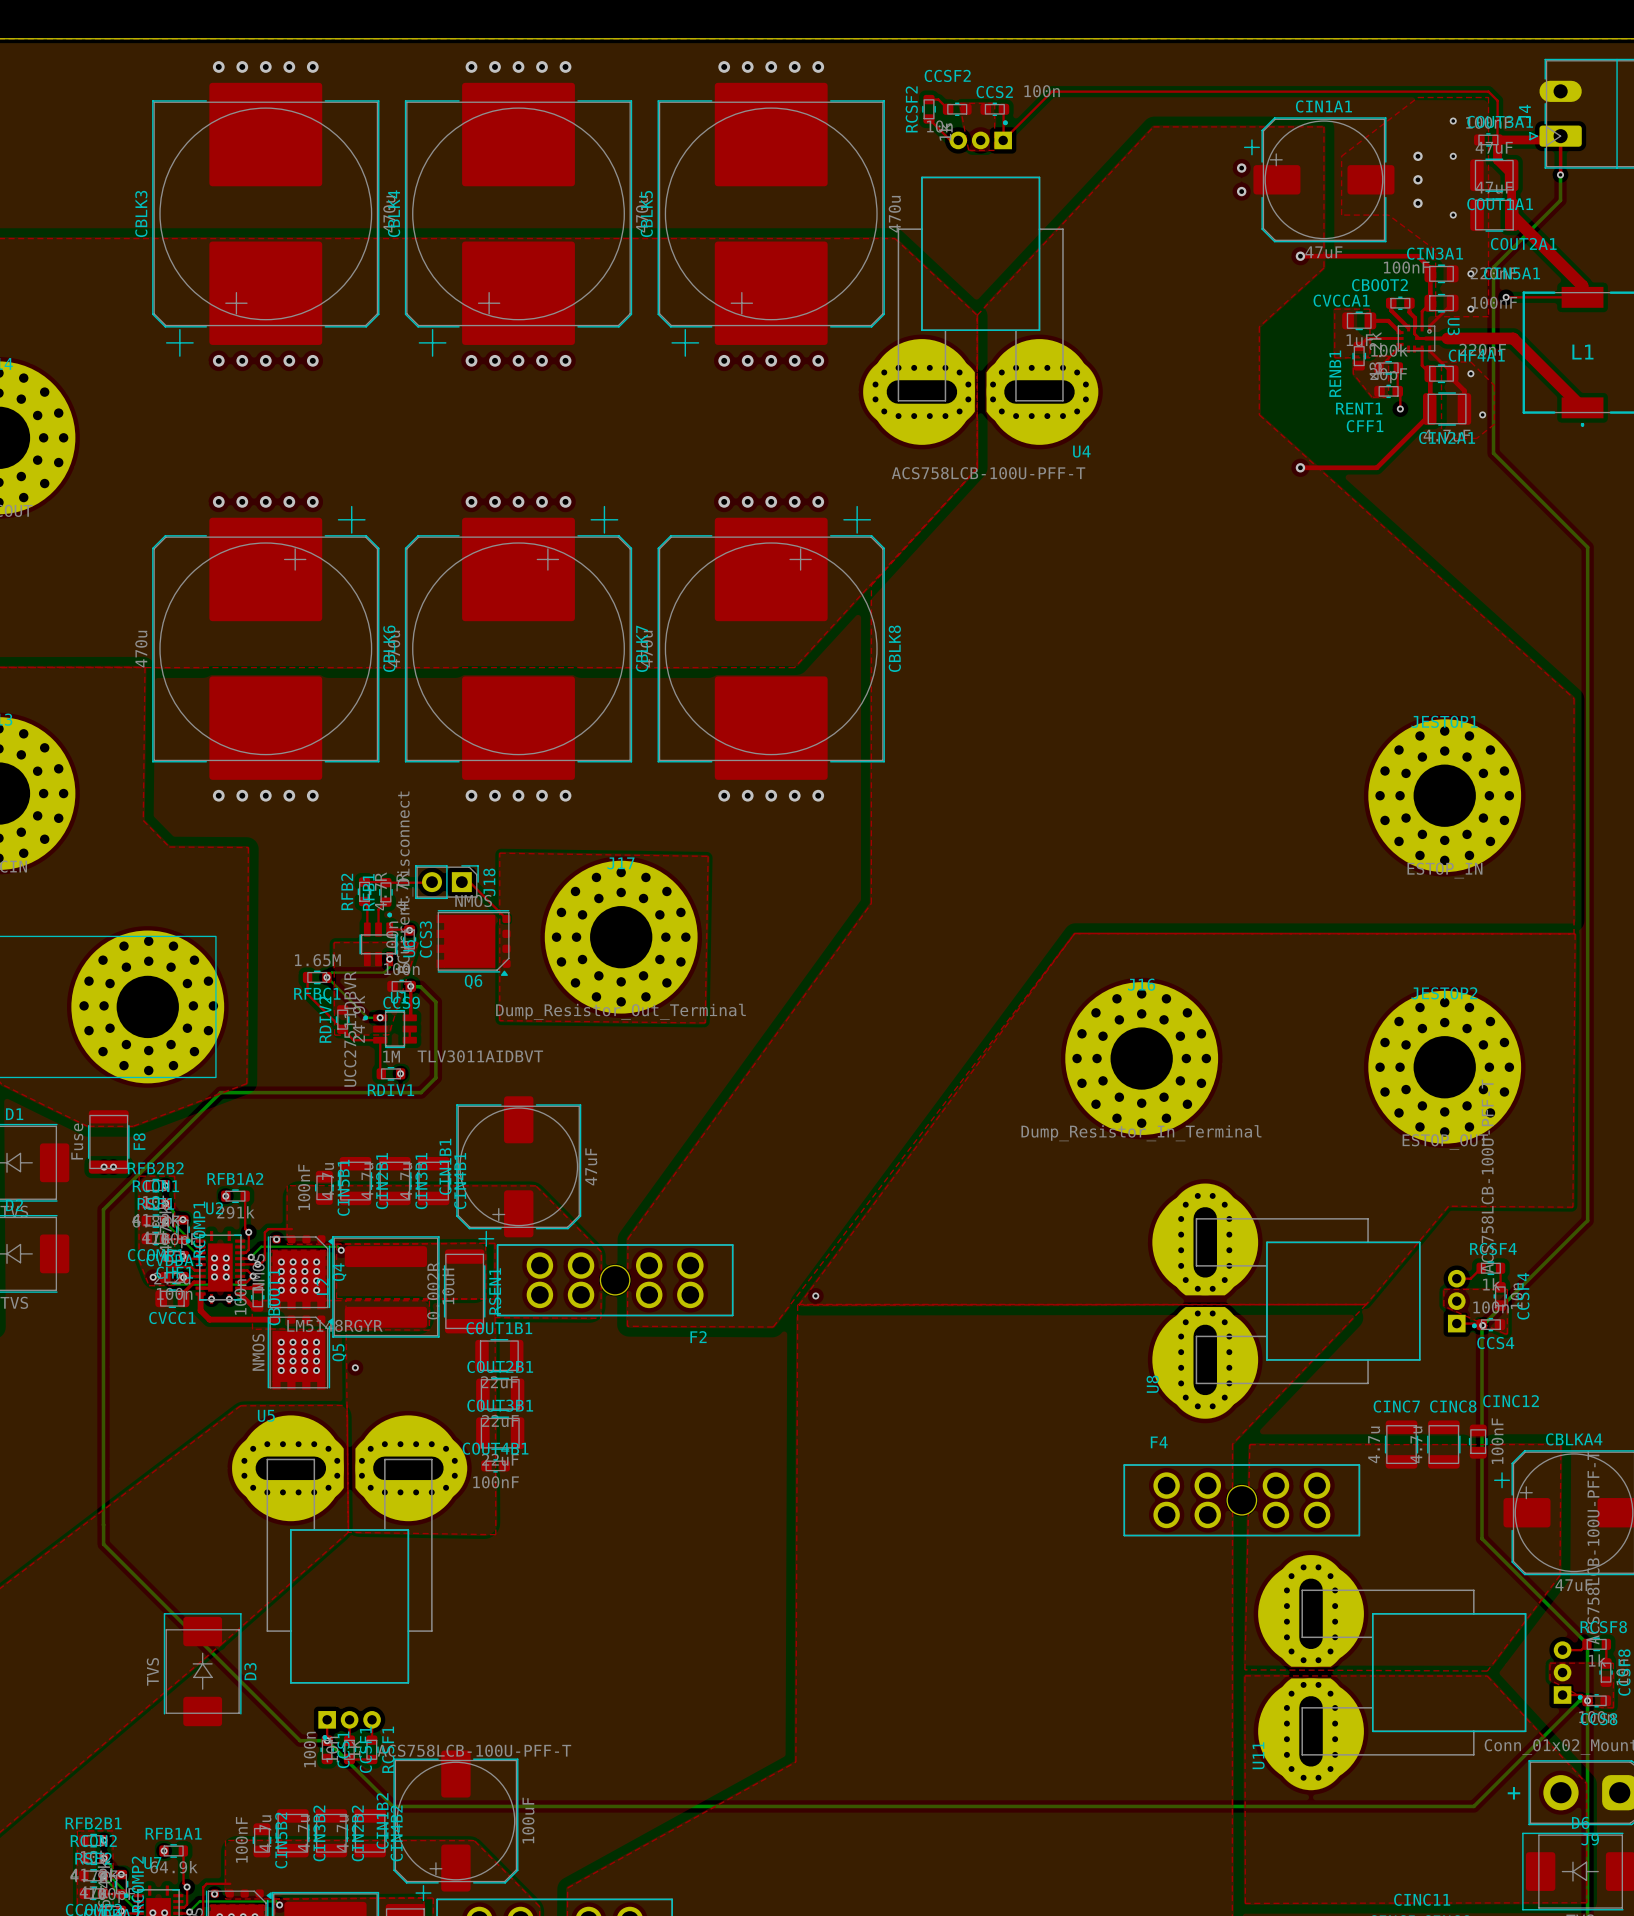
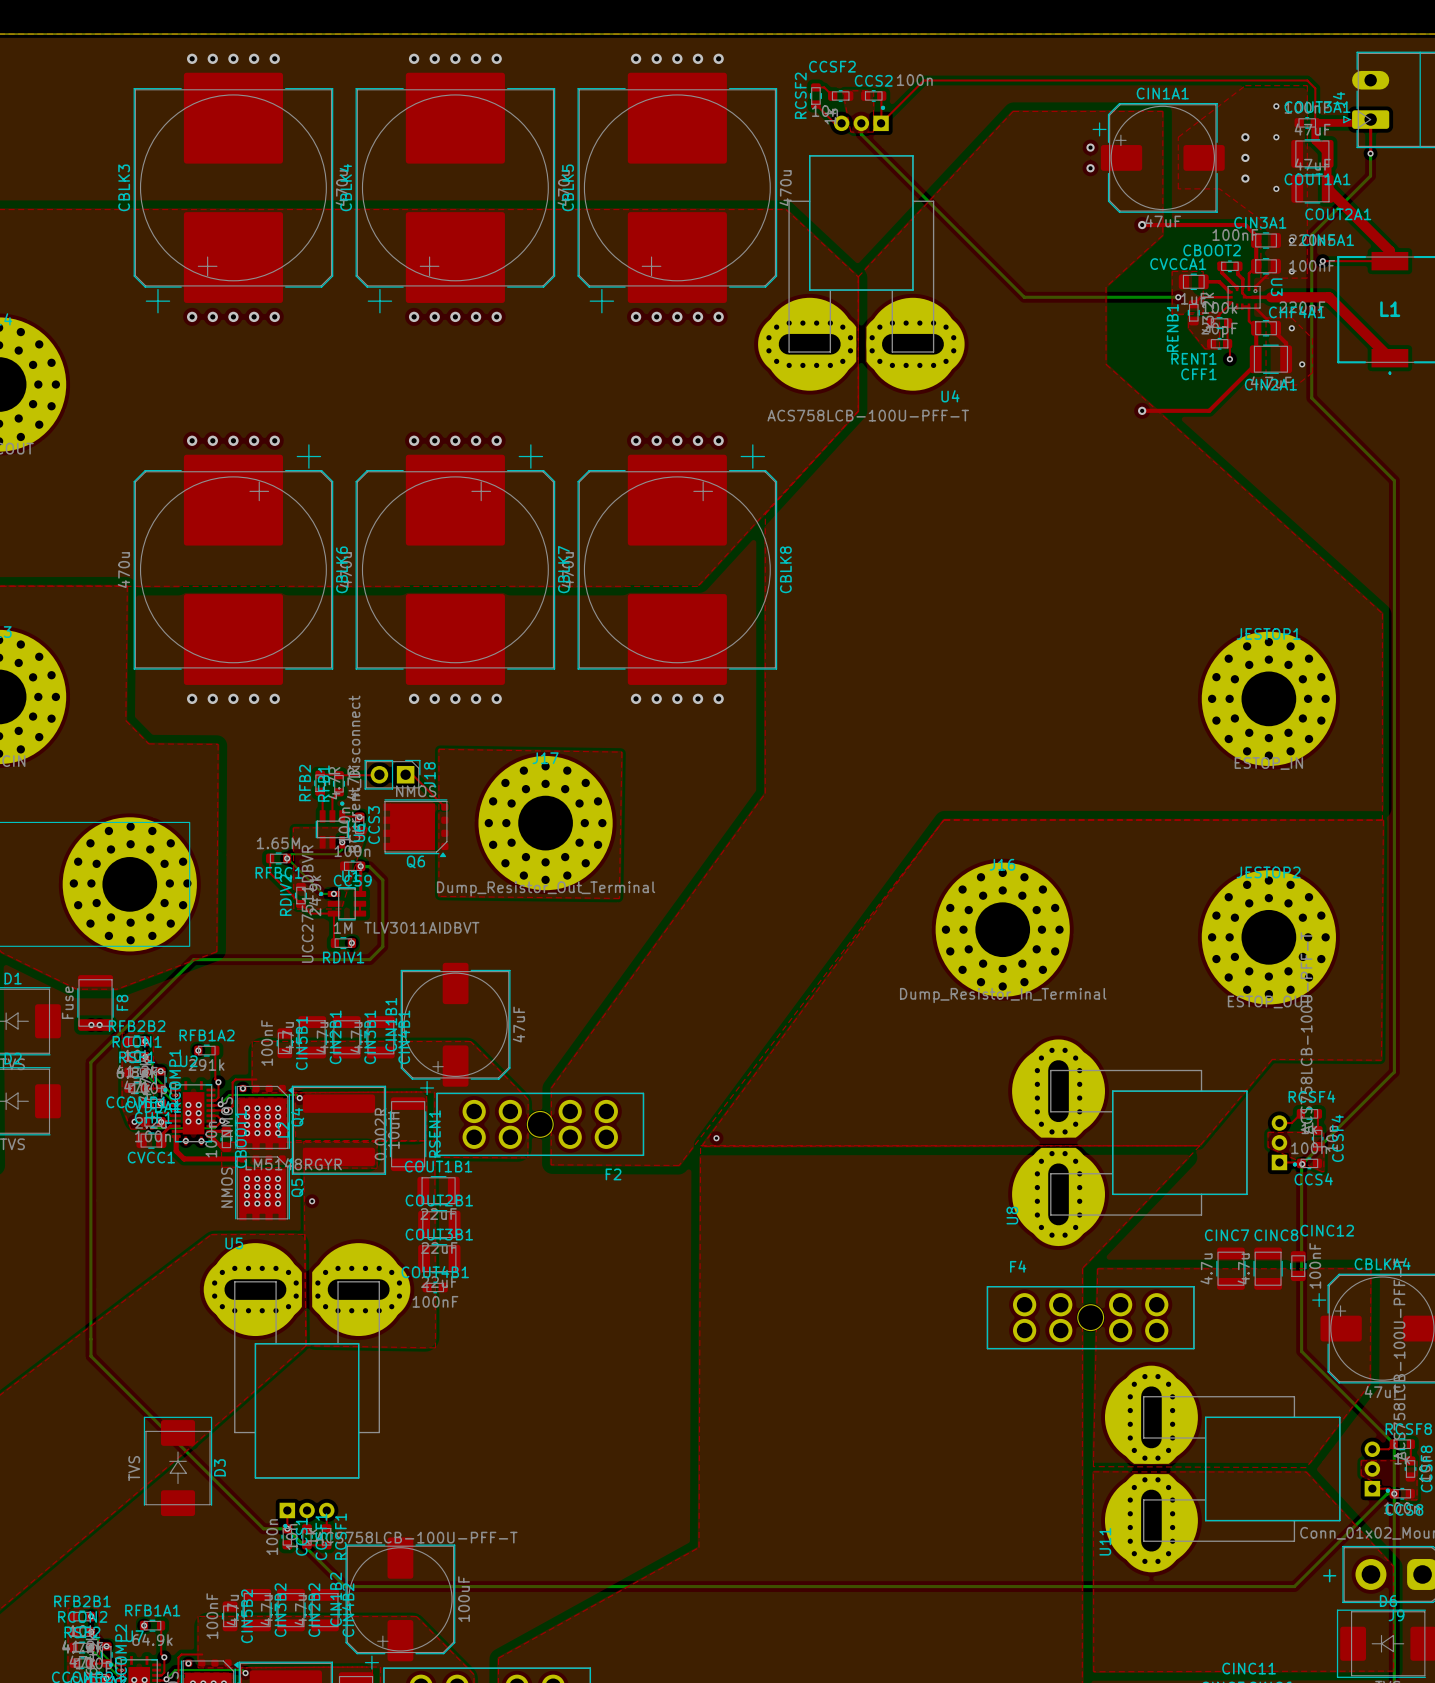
bottom track: none -> (861, 123) (861, 134) (1024, 297) (1178, 297)
via: none -> (1178, 297)

